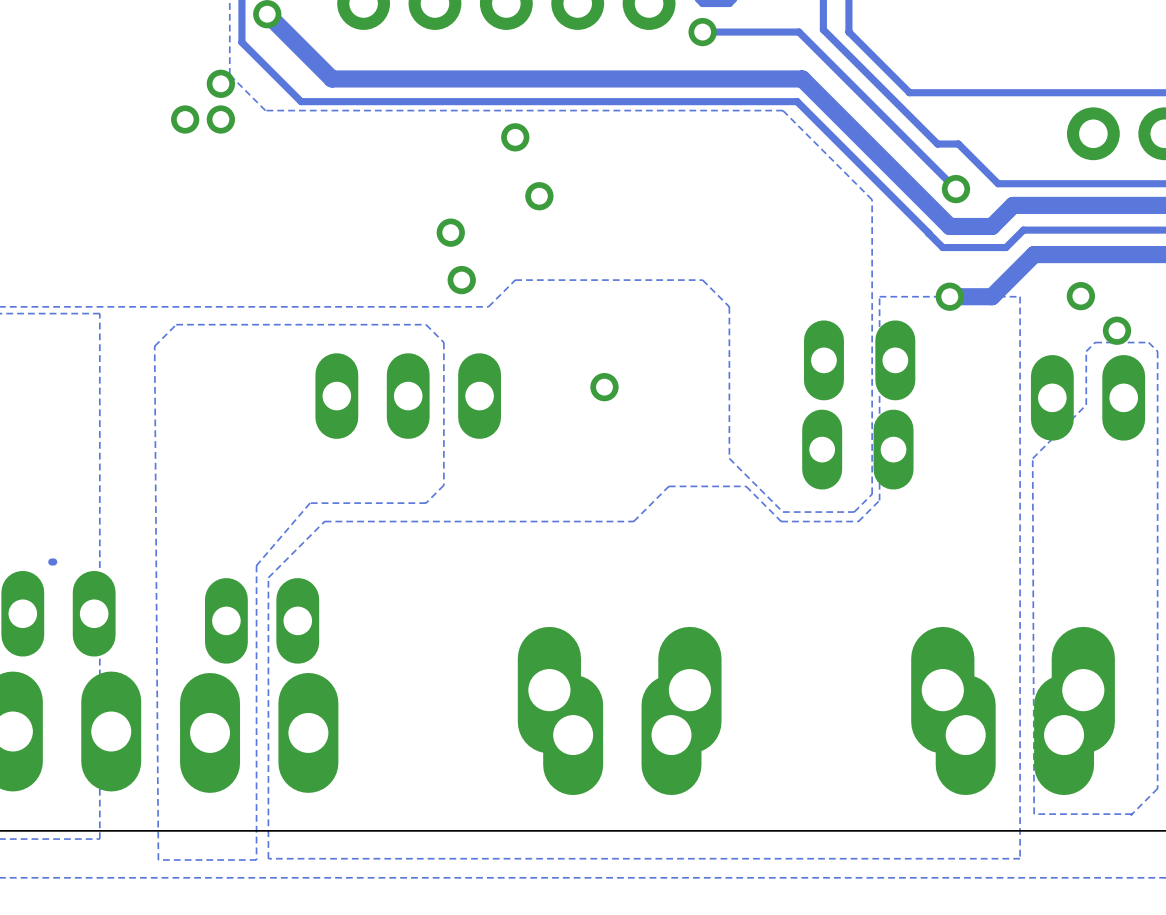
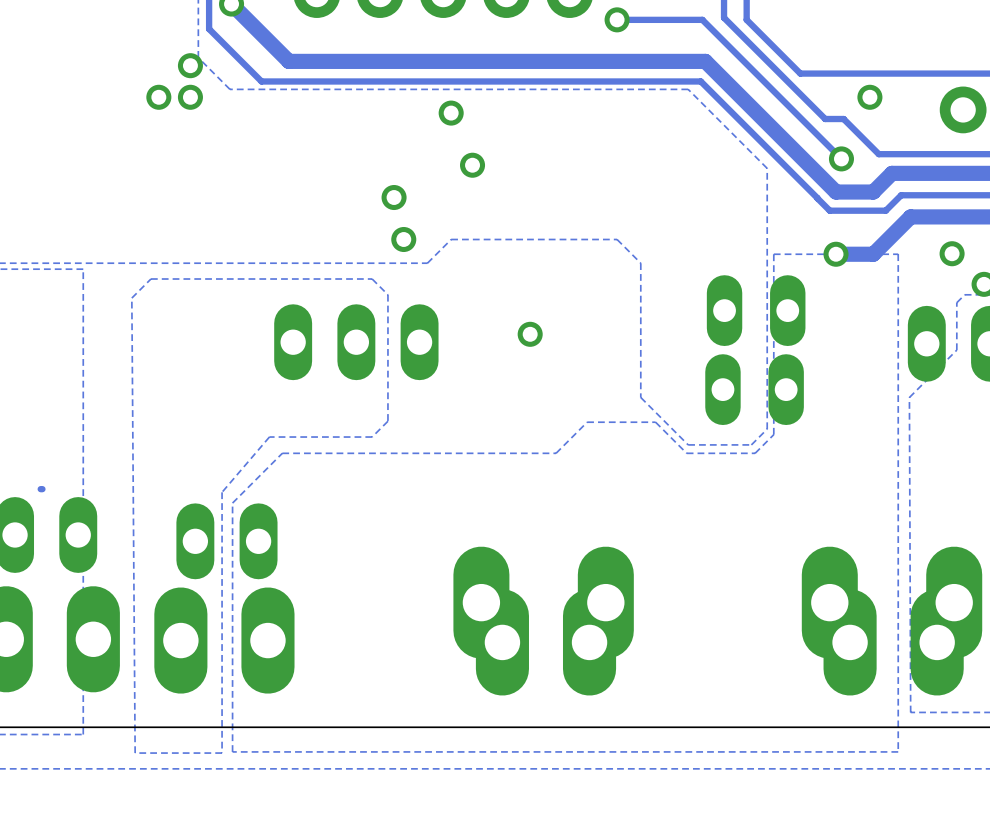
via: none -> (869, 97)

